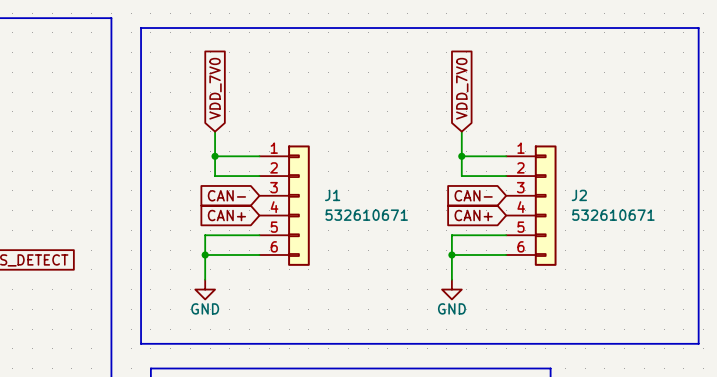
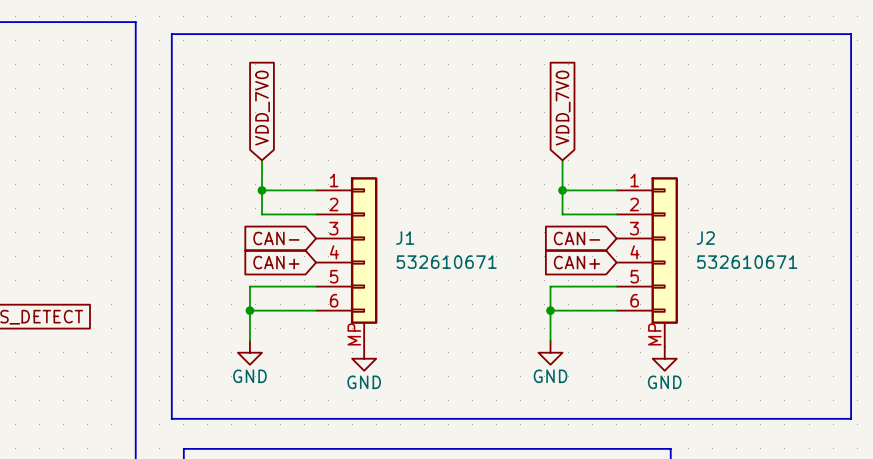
J1 symbol: [259, 145, 310, 266] -> [316, 177, 378, 347]
J2 symbol: [506, 145, 557, 266] -> [616, 177, 678, 347]
power symbol: none -> GND (364, 358)
power symbol: none -> GND (664, 358)

